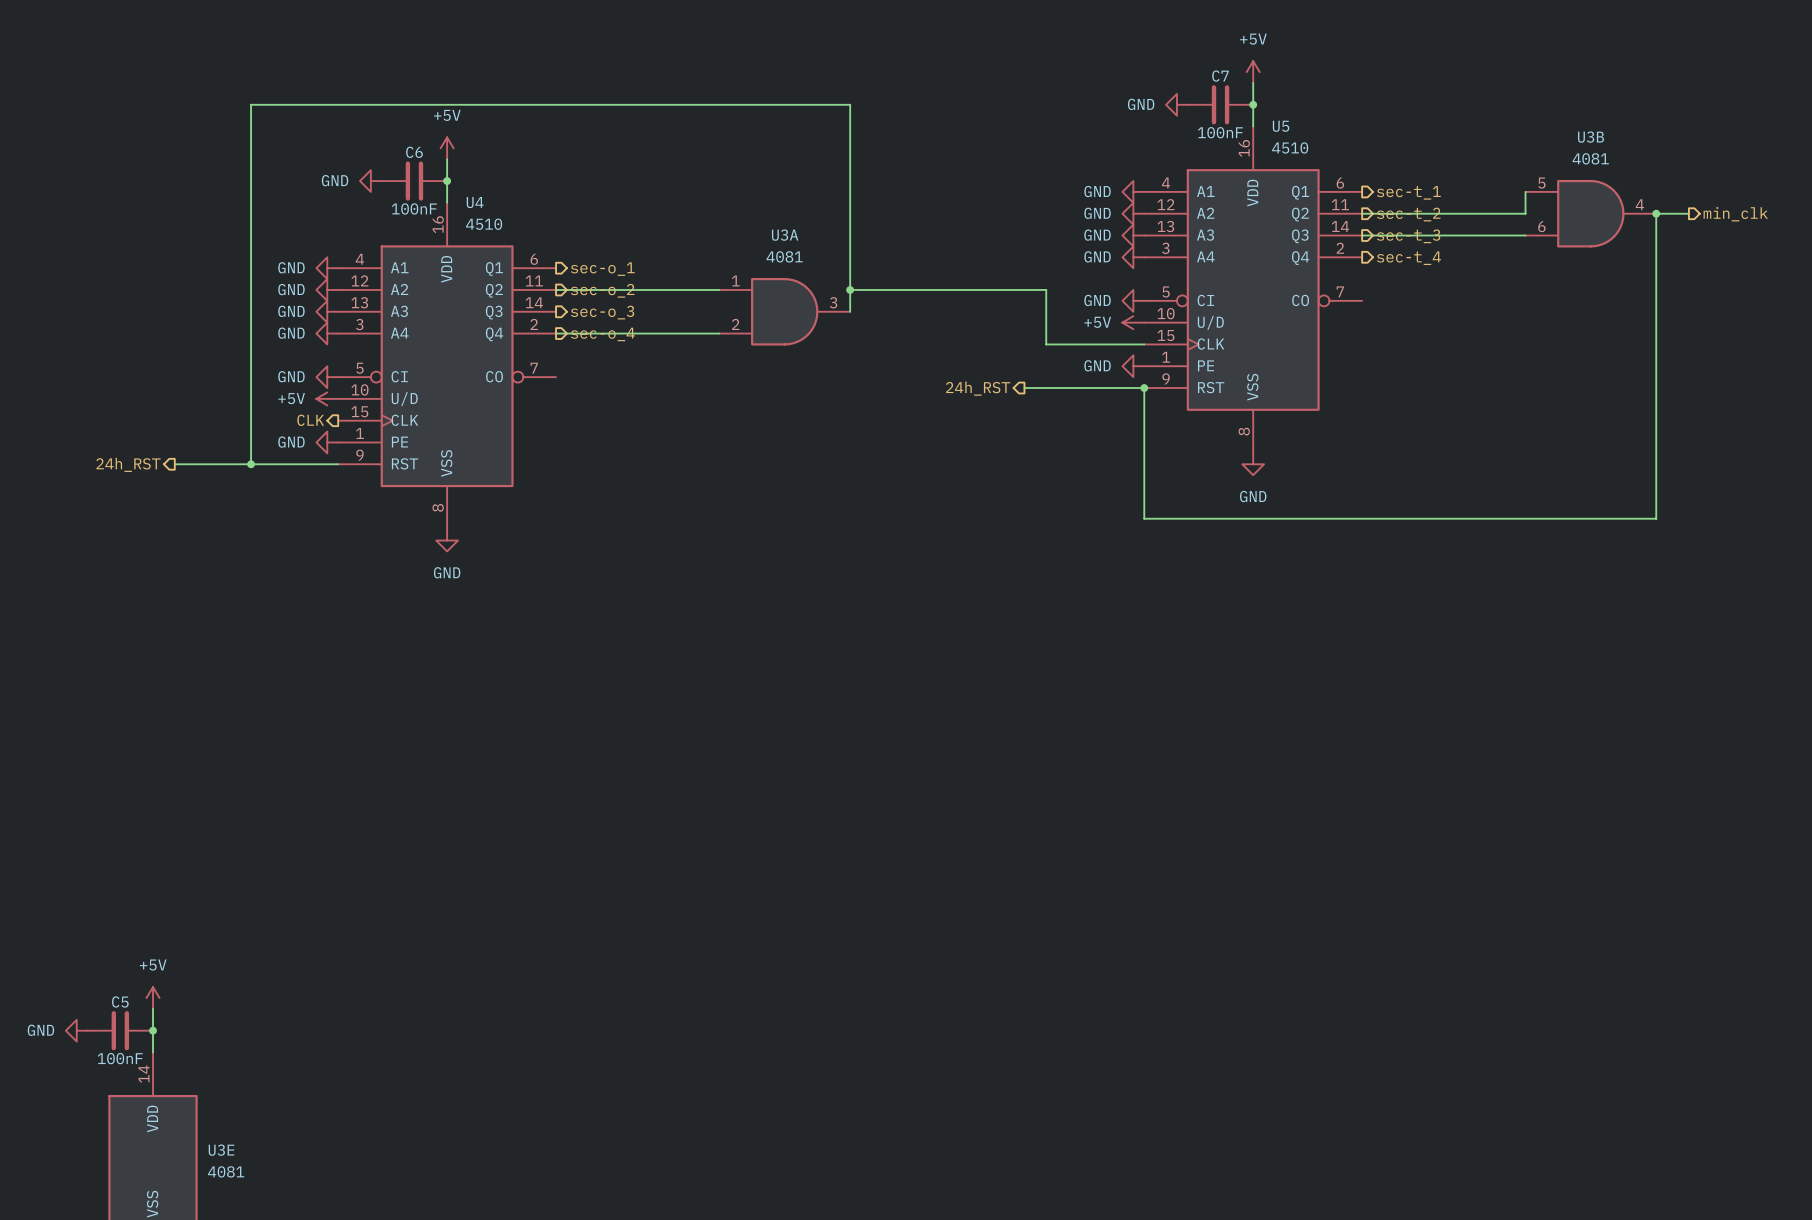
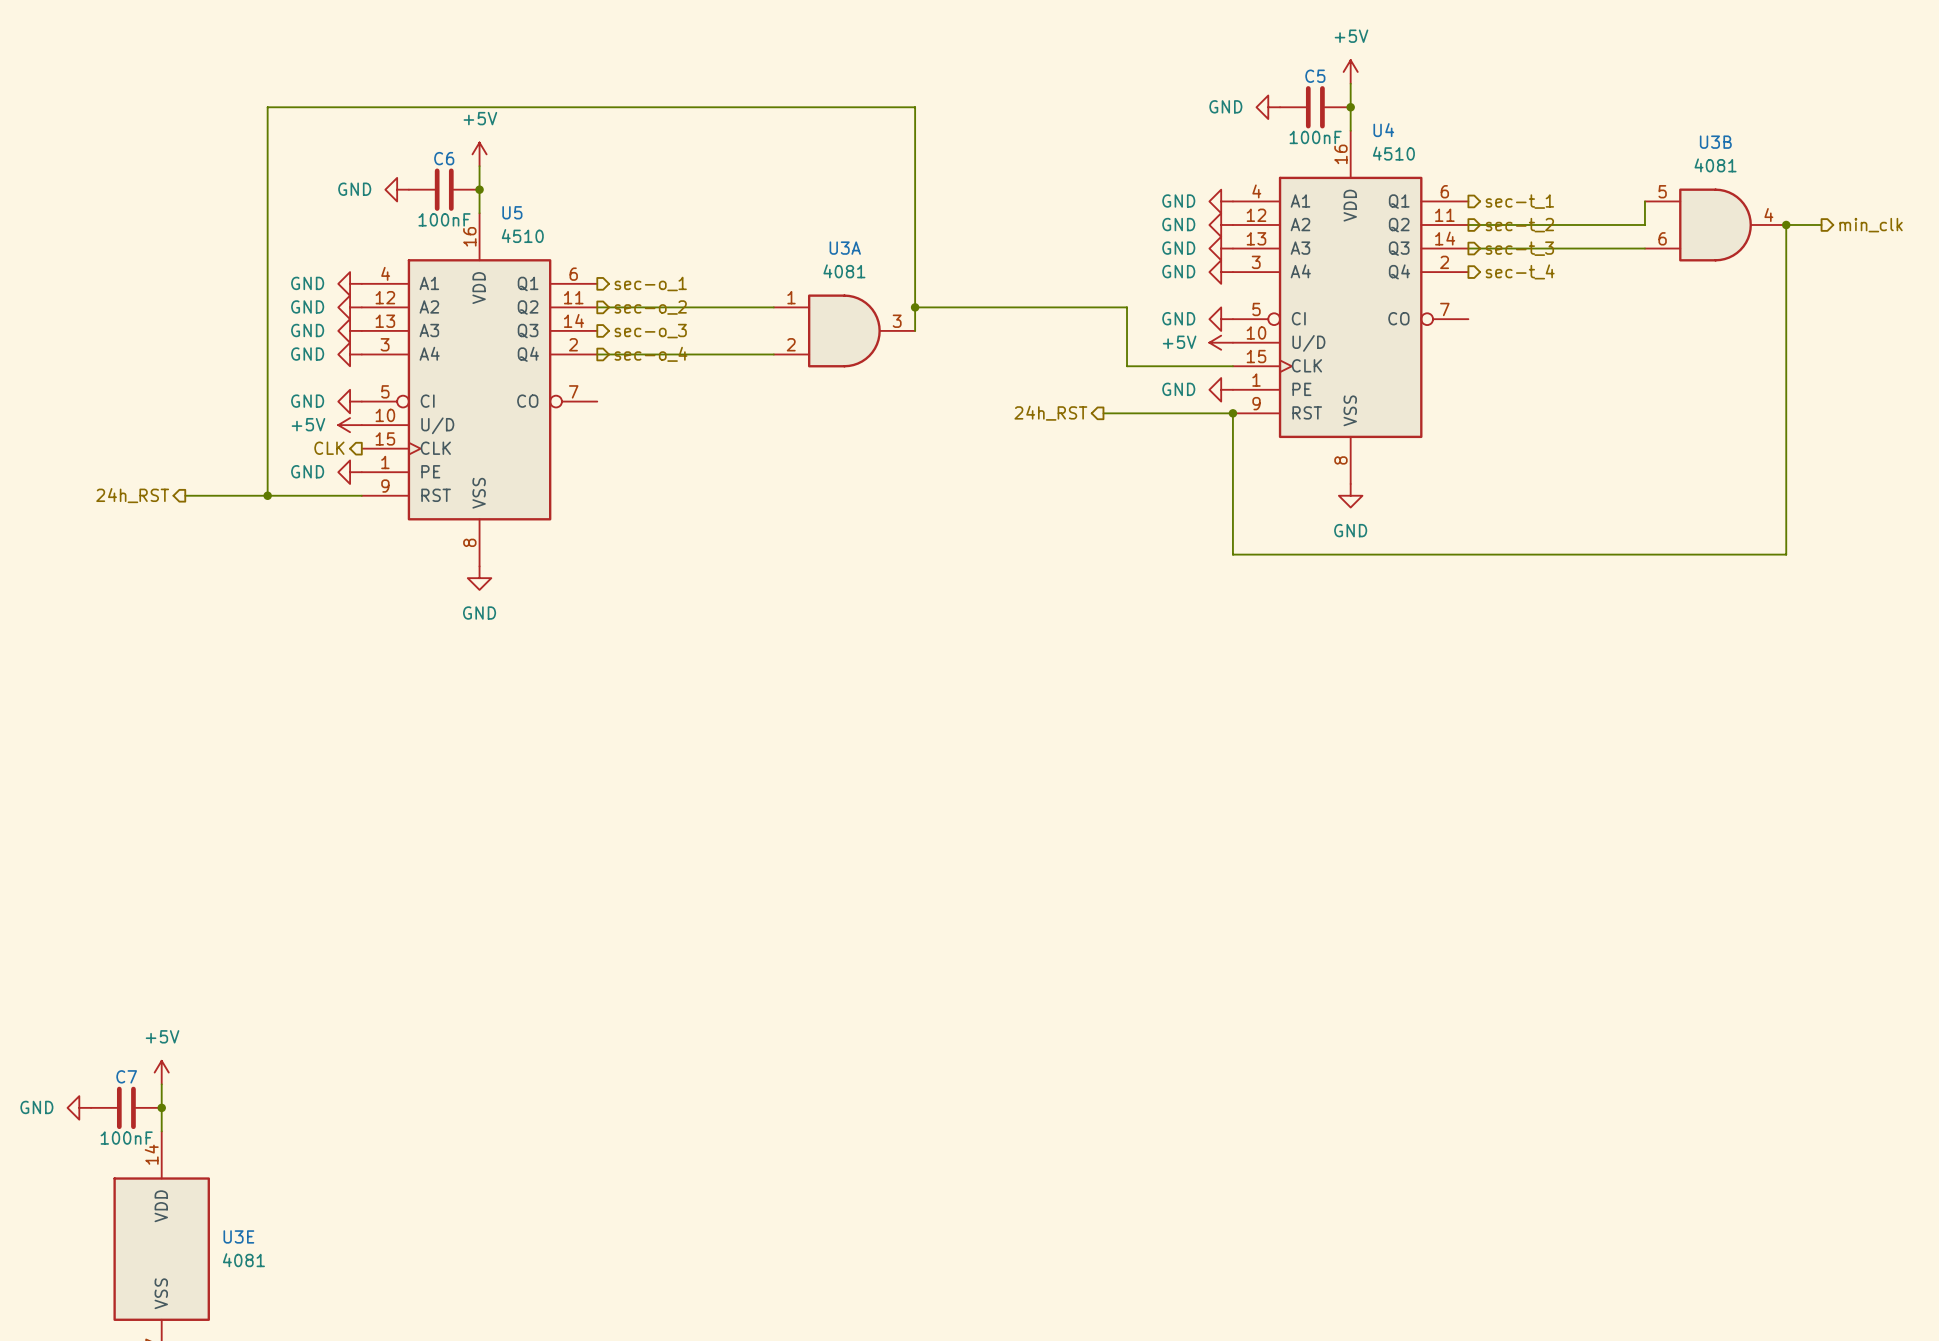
C7 name: C7 (1220, 76) -> C5 (1315, 76)
U5 name: U5 (1281, 126) -> U4 (1383, 130)
U4 name: U4 (475, 202) -> U5 (512, 212)
C5 name: C5 (120, 1001) -> C7 (126, 1076)

